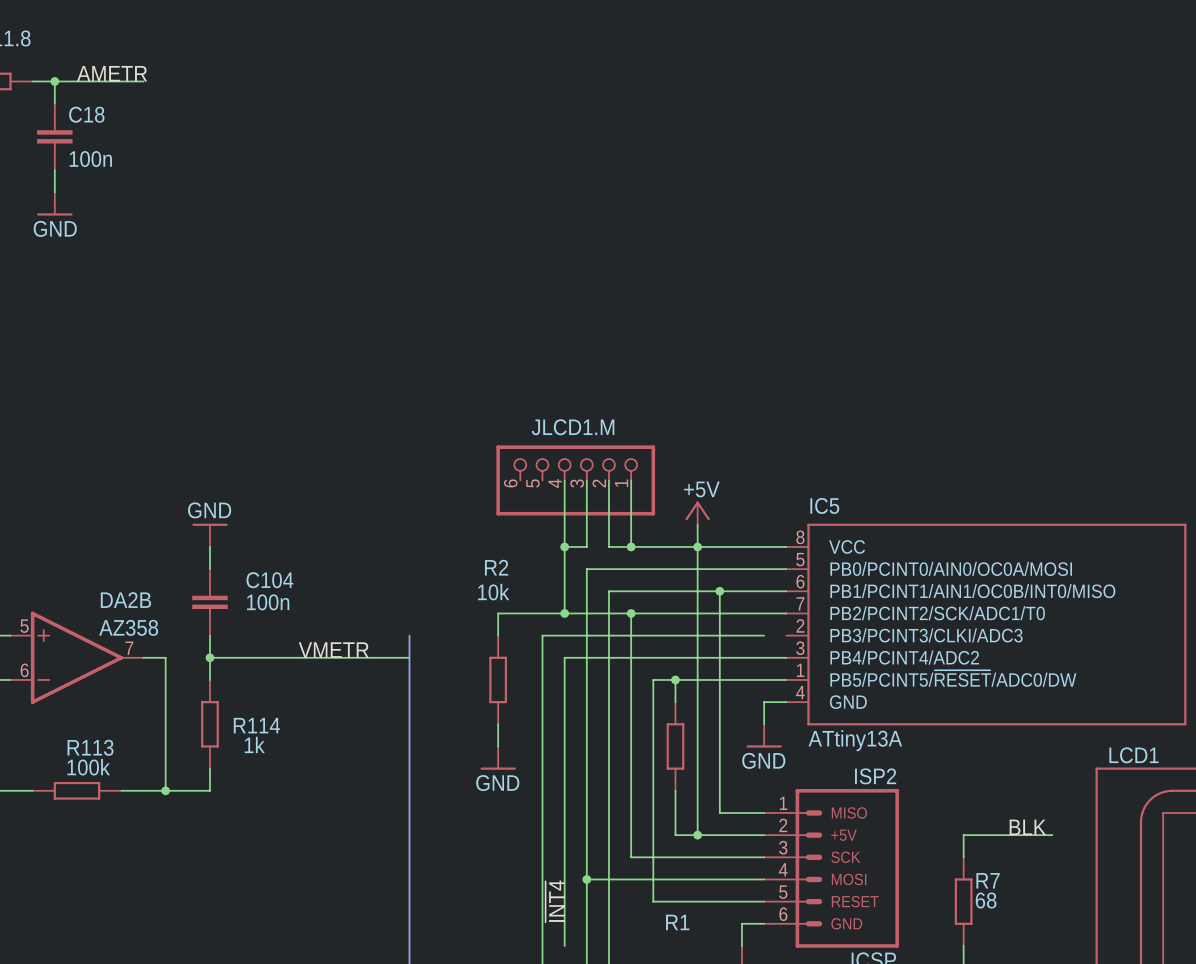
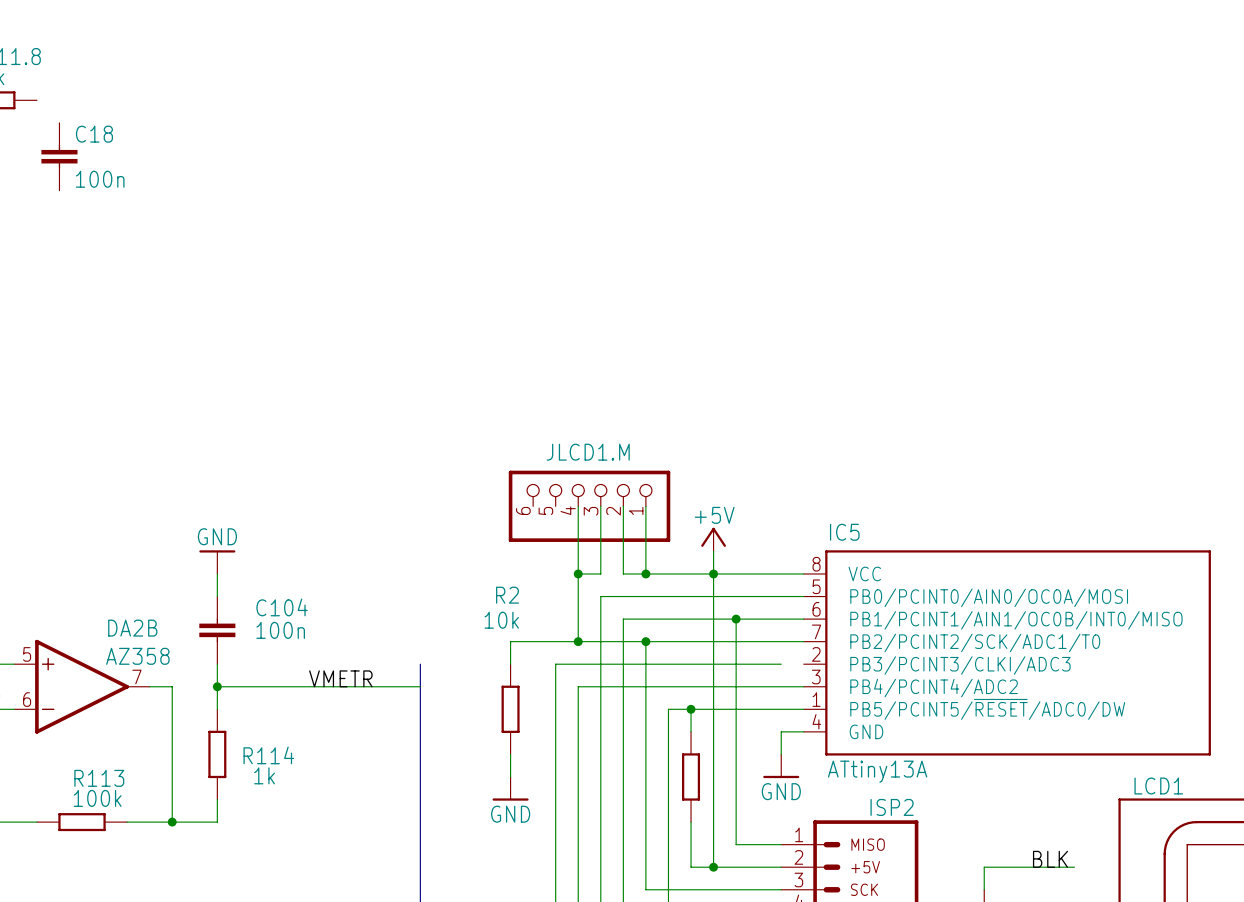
label: AMETR (112, 73) -> none
wire: (32, 81) (143, 81) -> none
wire: (54, 81) (54, 103) -> none
junction: (54, 81) -> none
wire: (54, 170) (54, 192) -> none
power symbol: GND (54, 203) -> none

